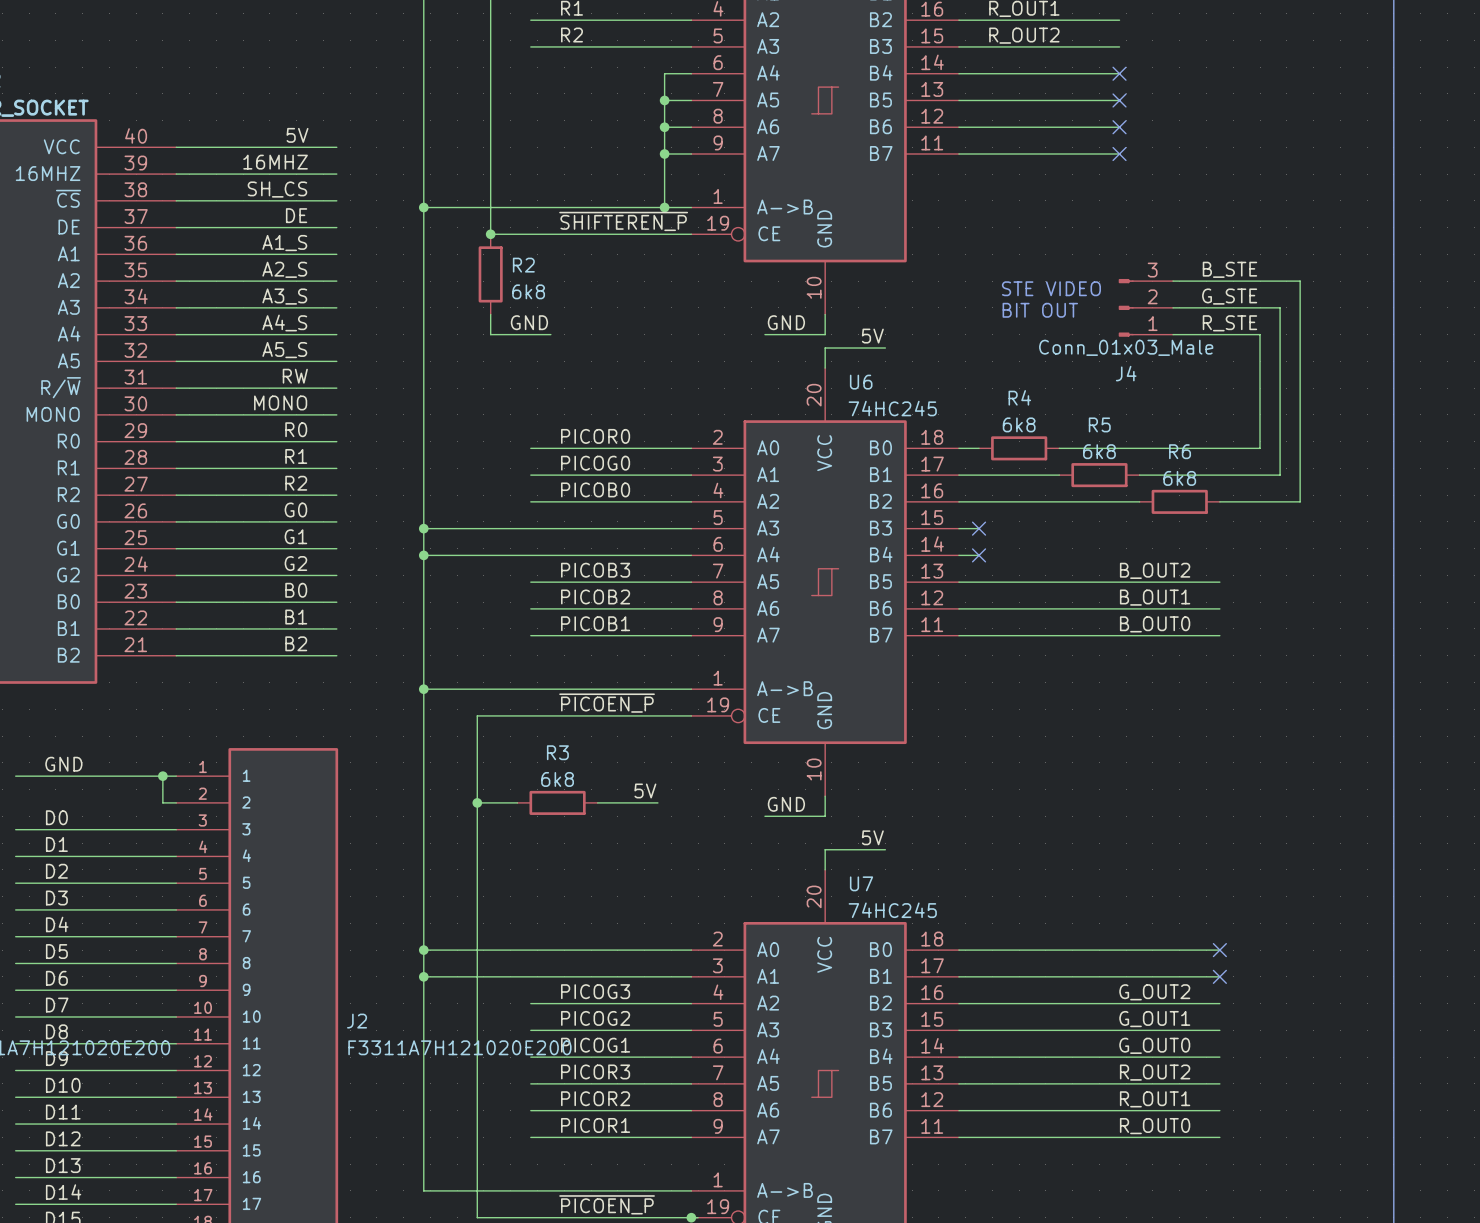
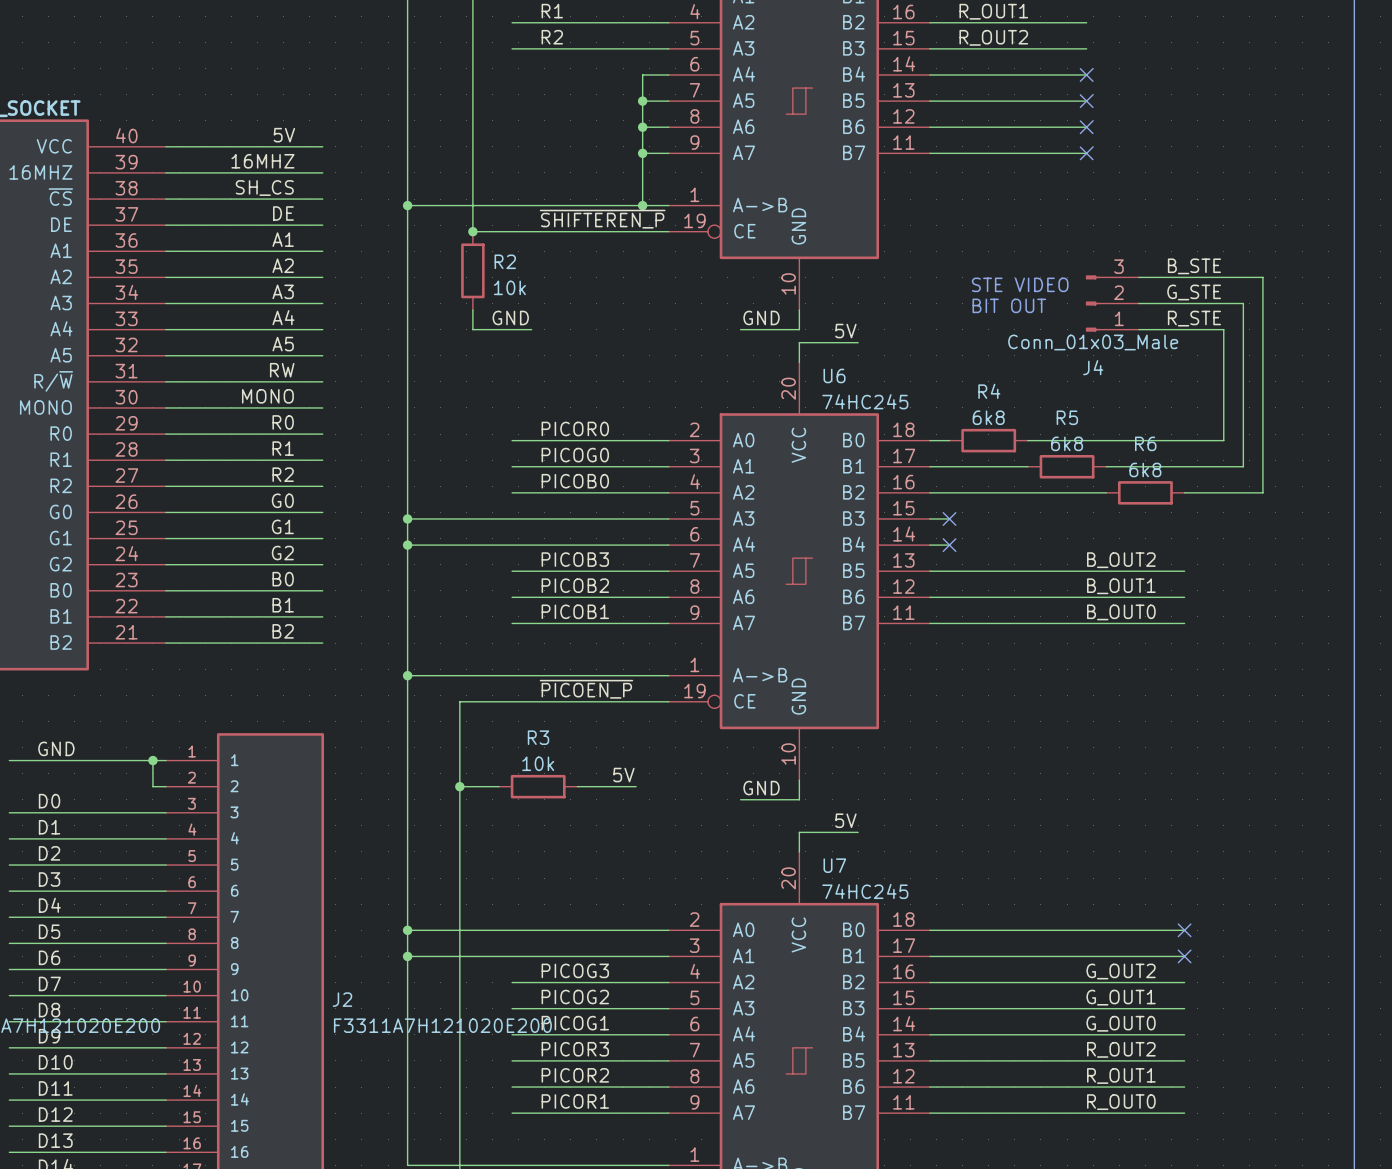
label: A1_S (284, 243) -> A1 (283, 239)
label: A2_S (284, 269) -> A2 (283, 265)
R2 value: 6k8 (528, 291) -> 10k (509, 287)
label: A3_S (284, 296) -> A3 (283, 291)
label: A4_S (284, 323) -> A4 (283, 317)
label: A5_S (284, 350) -> A5 (283, 344)
R3 value: 6k8 (557, 779) -> 10k (538, 763)

